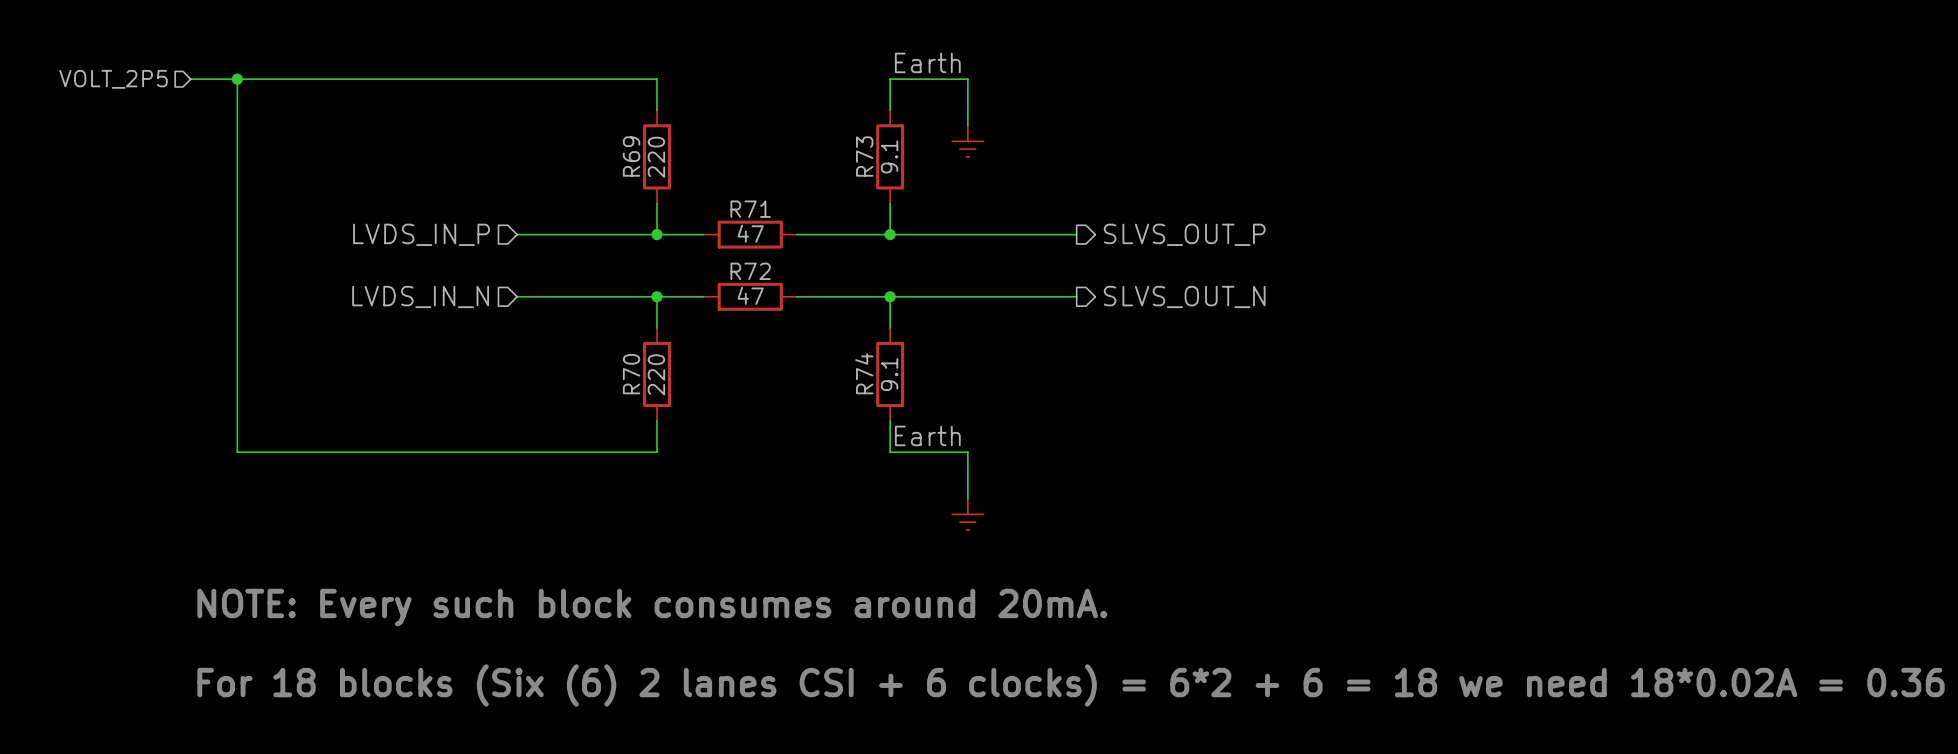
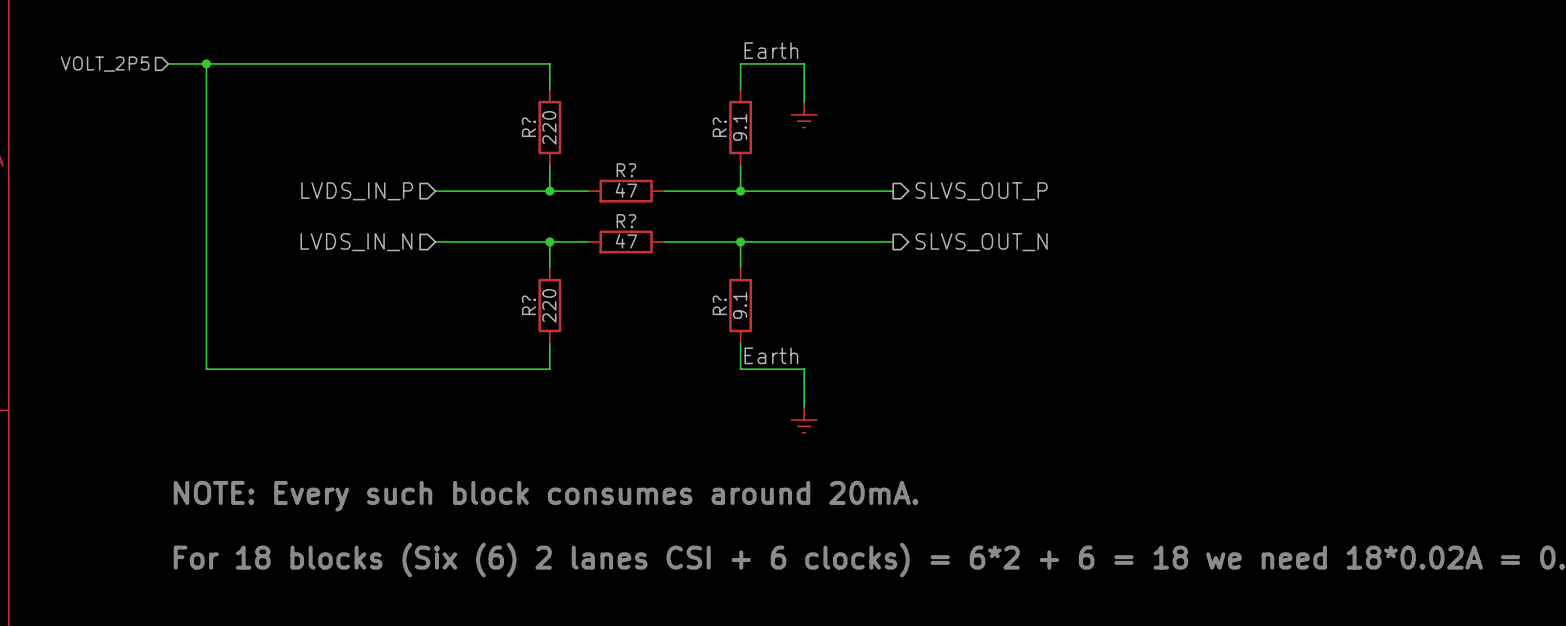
R69 name: R69 (631, 156) -> R? (529, 127)
R73 name: R73 (864, 156) -> R? (719, 127)
R71 name: R71 (750, 209) -> R? (626, 170)
R72 name: R72 (750, 271) -> R? (626, 221)
R74 name: R74 (864, 373) -> R? (719, 305)
R70 name: R70 (631, 374) -> R? (529, 305)

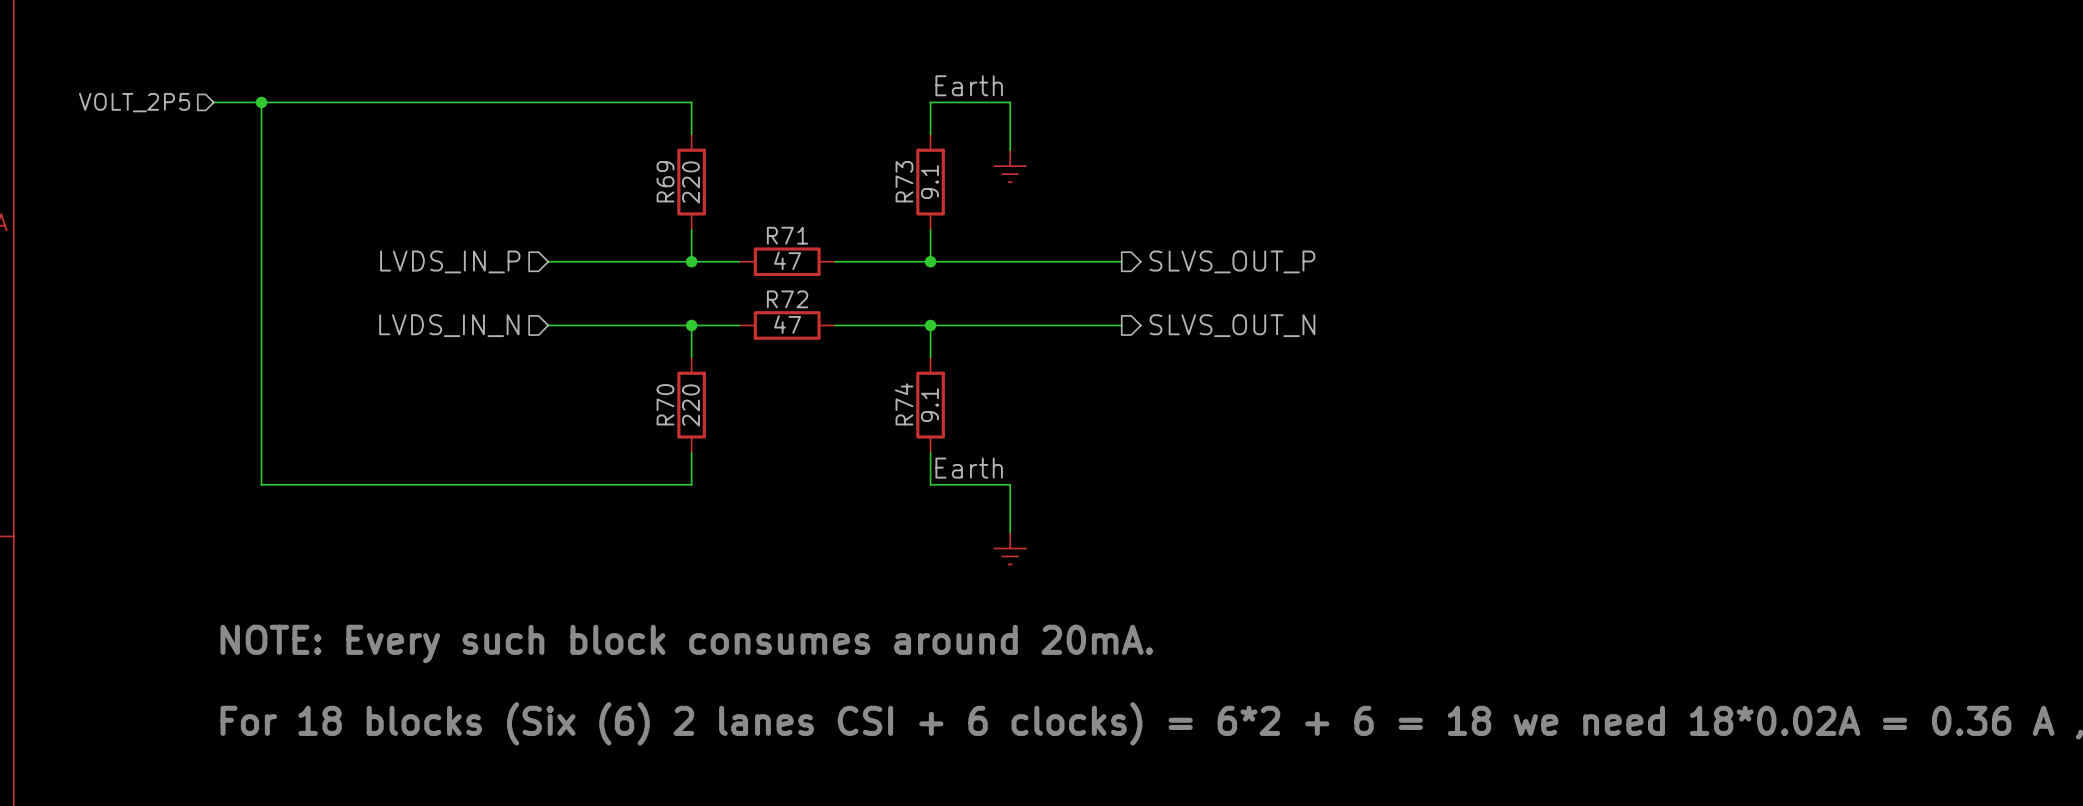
R? name: R? (529, 127) -> R69 (665, 181)
R? name: R? (719, 127) -> R73 (904, 181)
R? name: R? (626, 170) -> R71 (787, 235)
R? name: R? (626, 221) -> R72 (787, 299)
R? name: R? (529, 305) -> R70 (665, 404)
R? name: R? (719, 305) -> R74 (904, 404)

